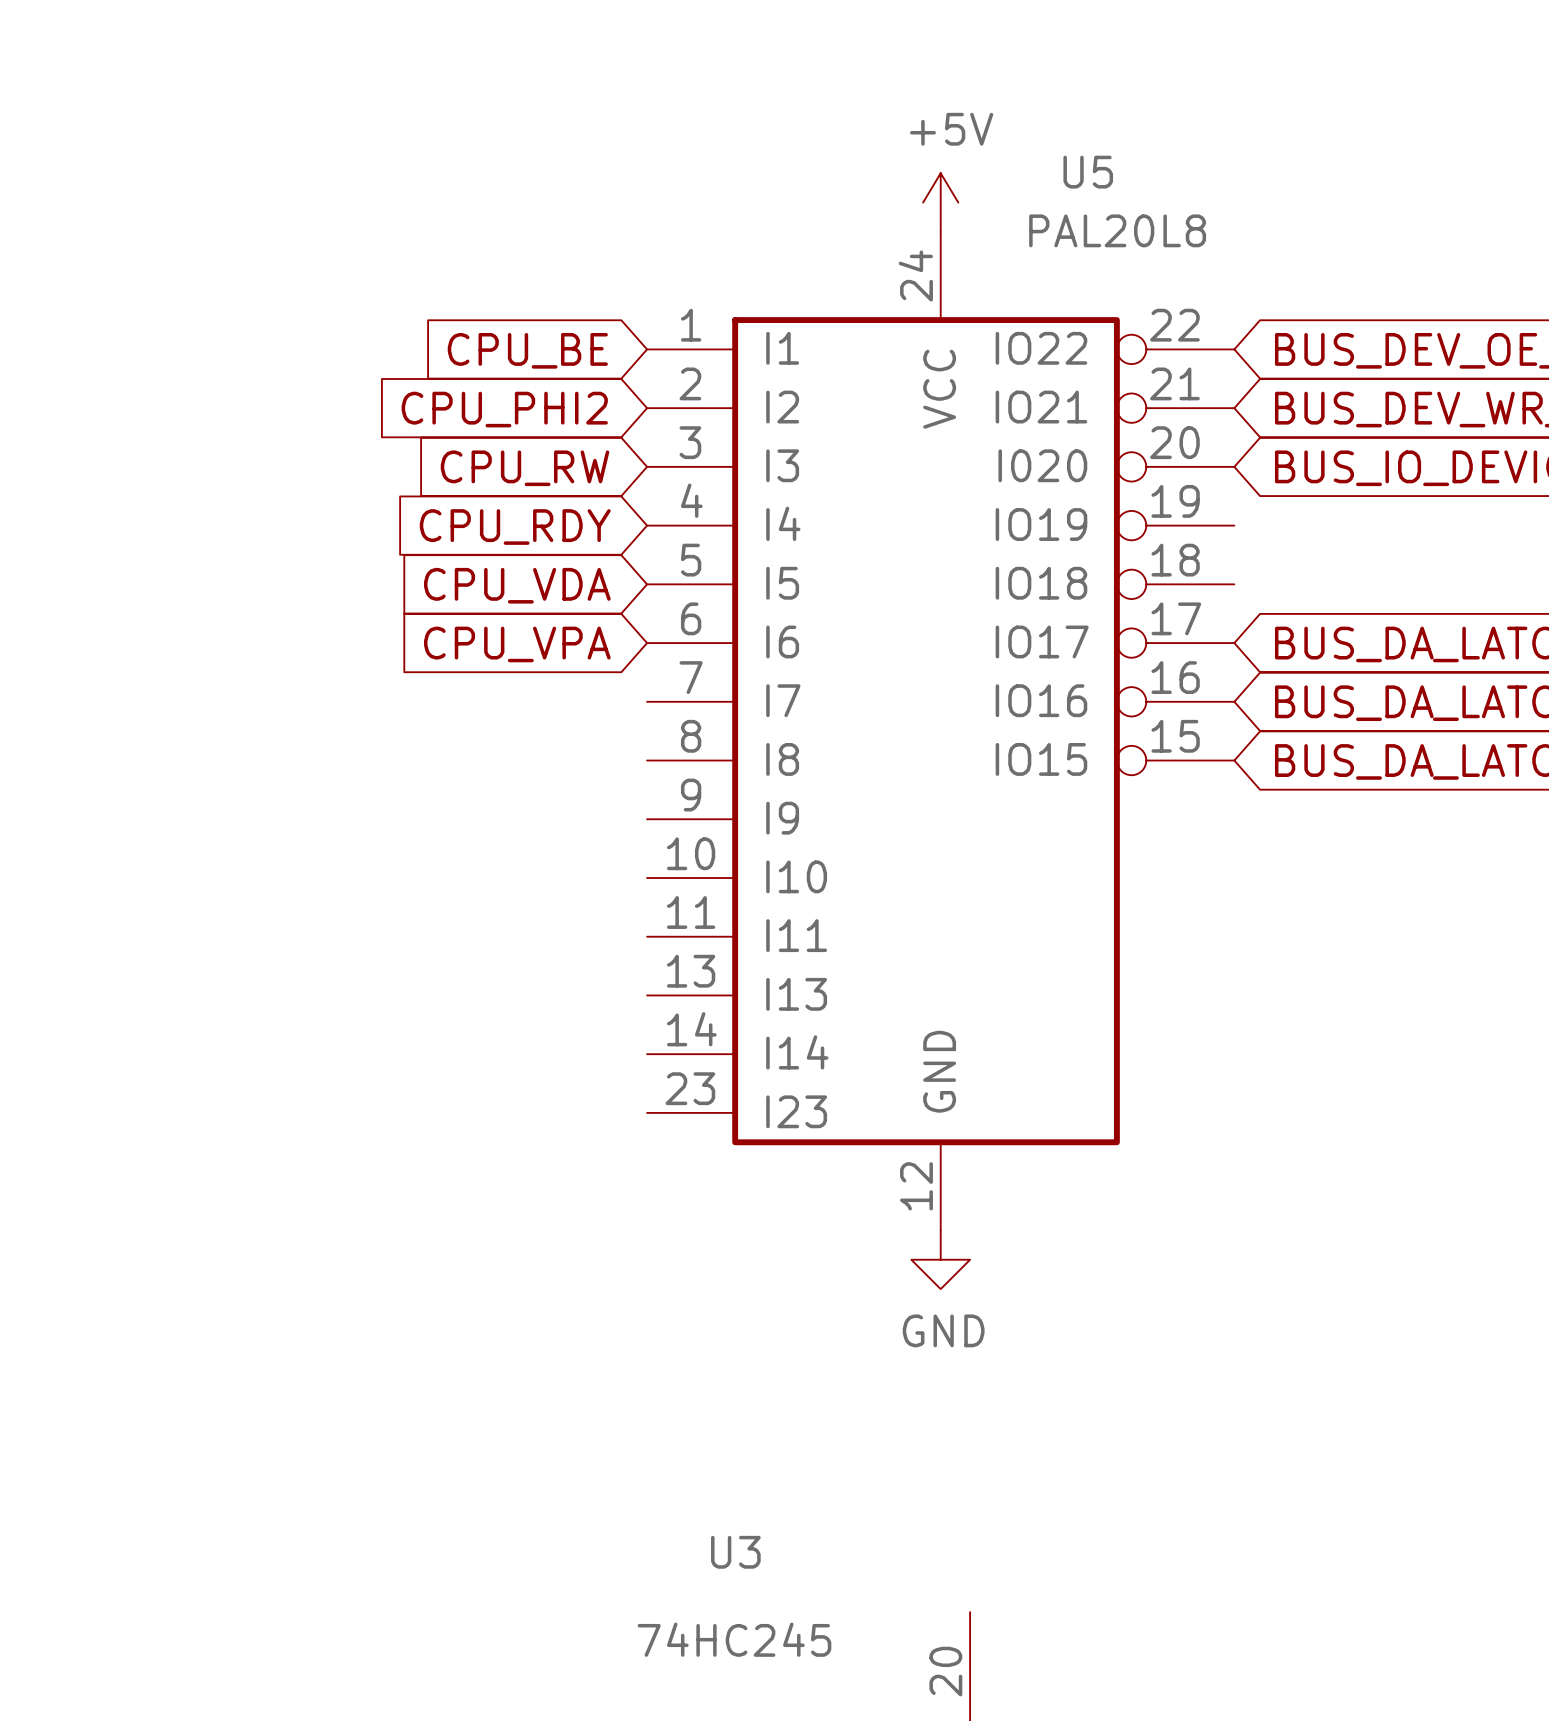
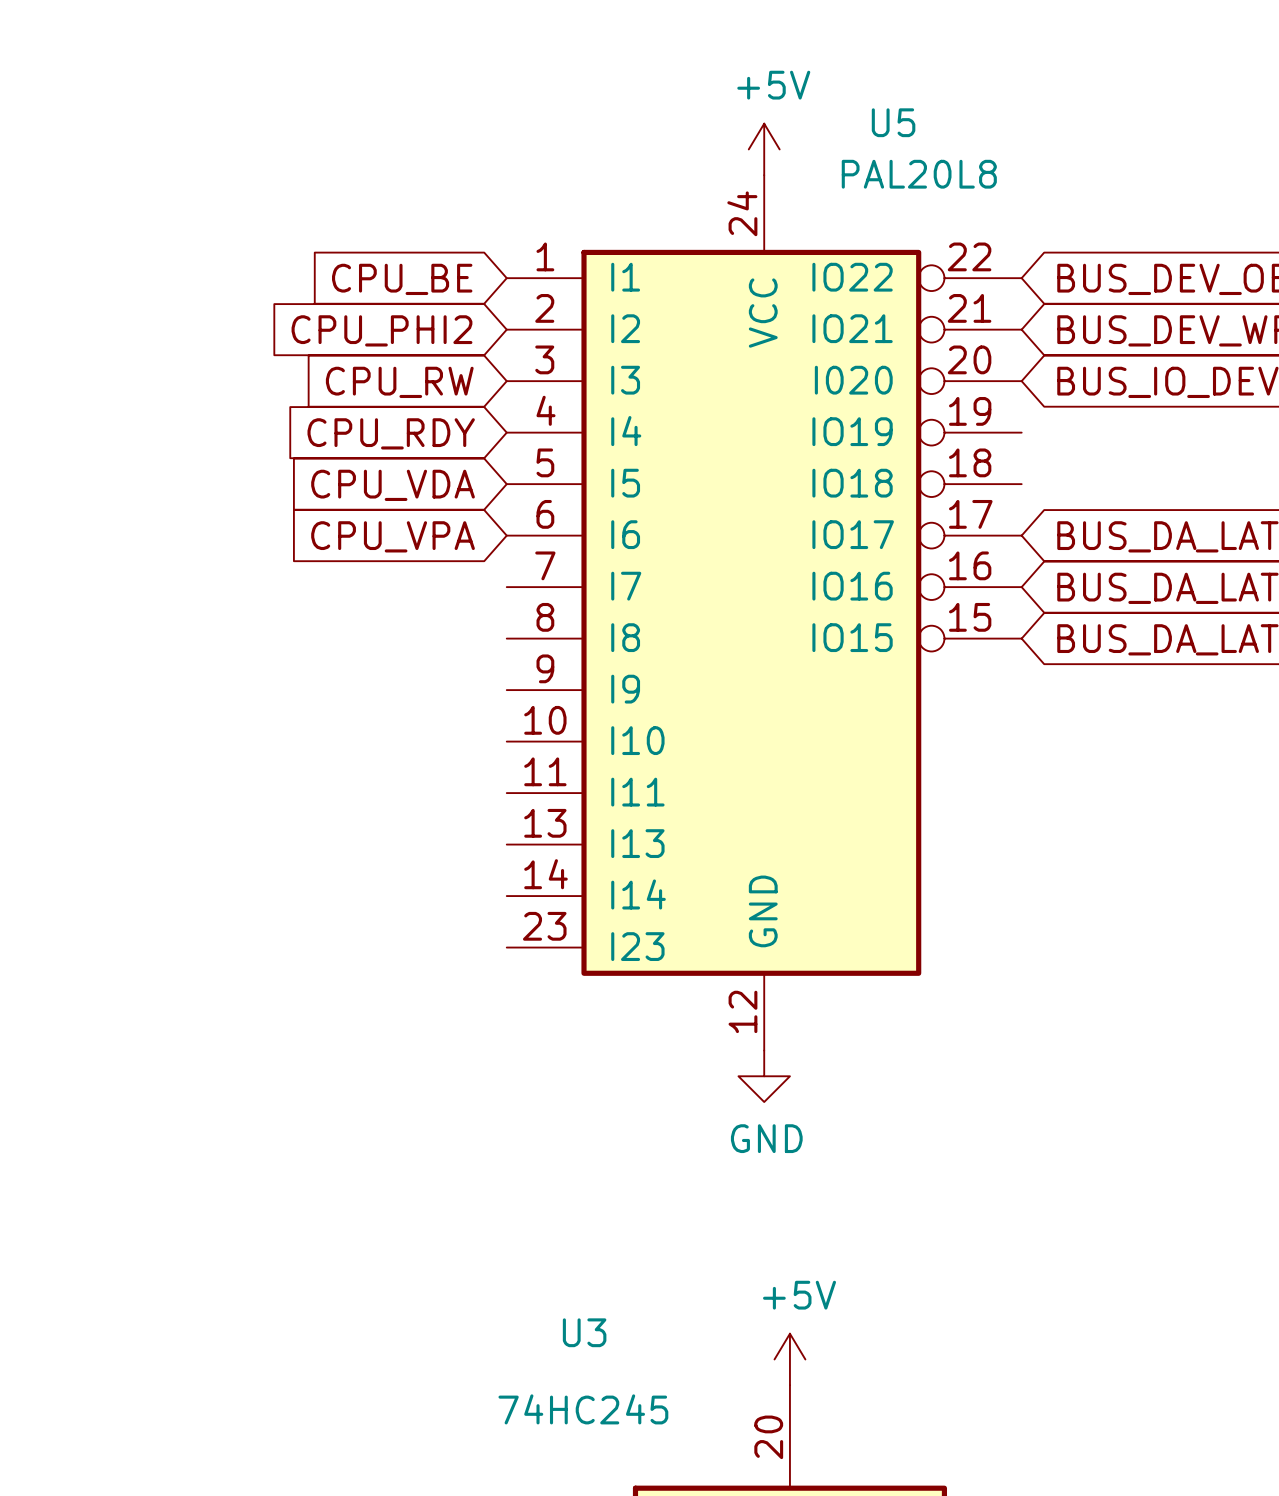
power symbol: none -> +5V (789, 1359)

